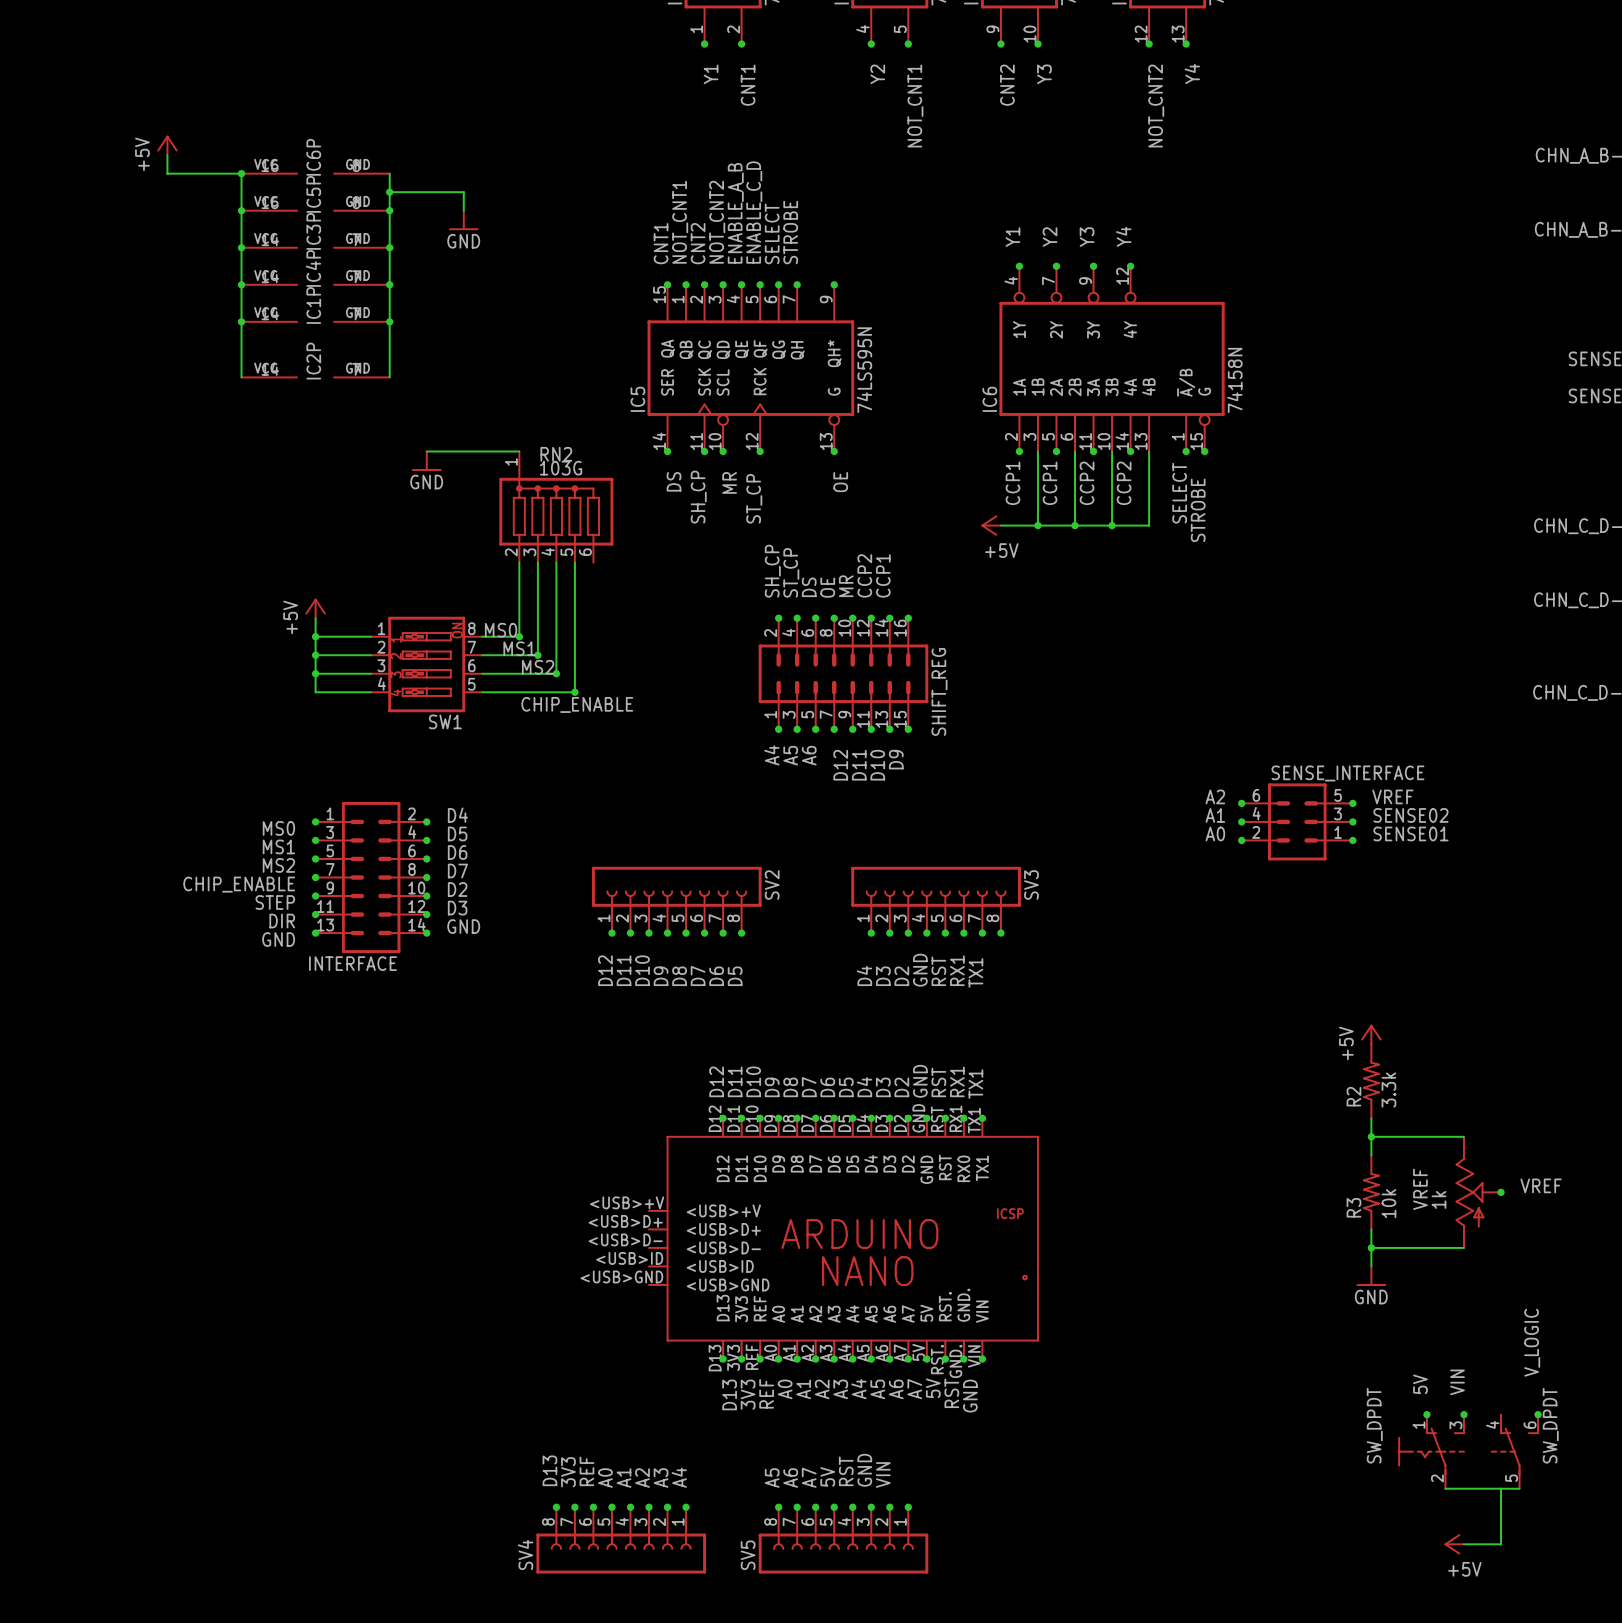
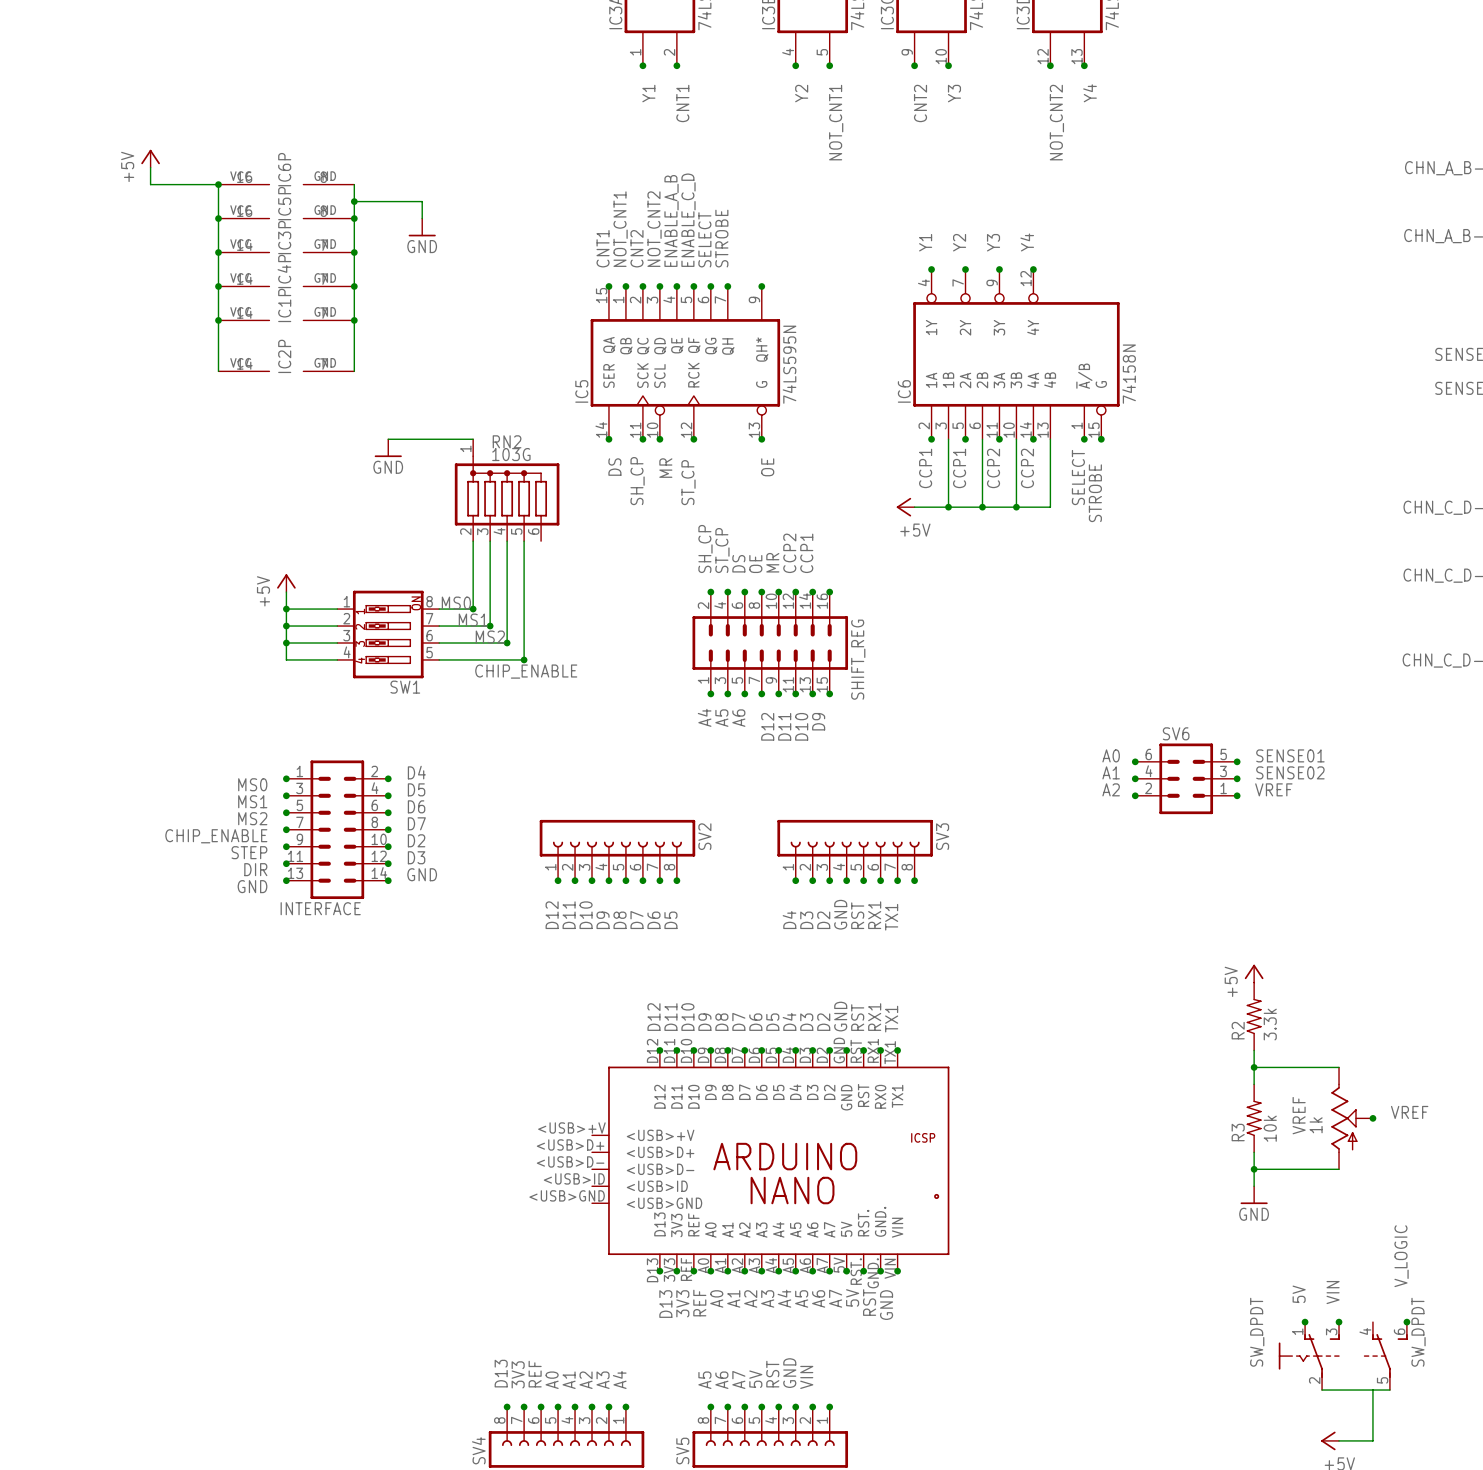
SENSE_INTERFACE name: SENSE_INTERFACE (1347, 773) -> SV6 (1176, 733)
label: A2 (1215, 796) -> A0 (1111, 755)
label: VREF (1392, 796) -> SENSE01 (1290, 755)
label: A0 (1215, 833) -> A2 (1111, 789)
label: SENSE01 (1410, 833) -> VREF (1273, 789)

